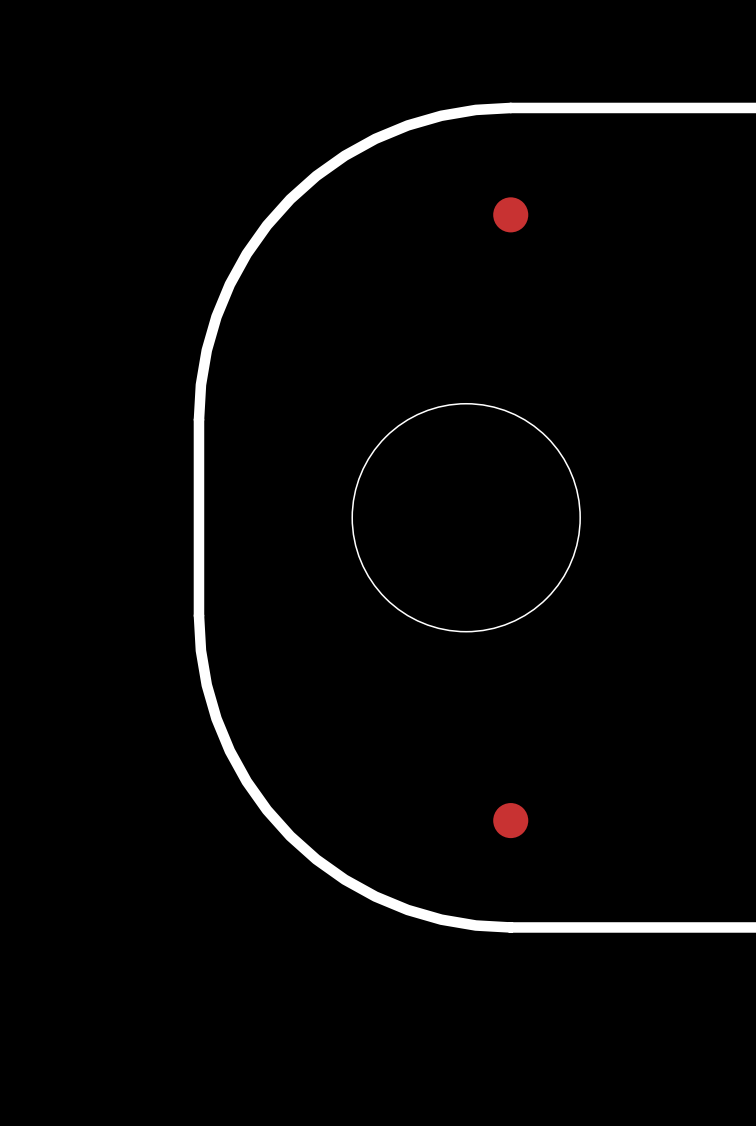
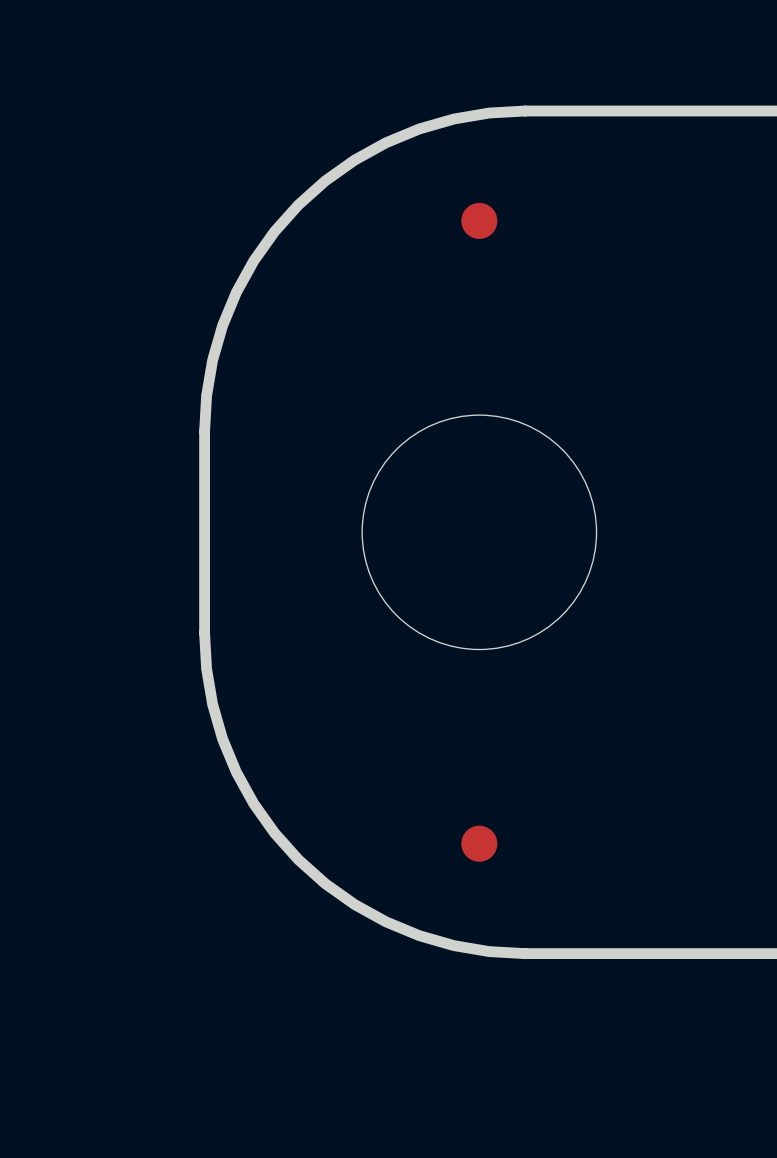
part position: (510, 214) -> (479, 220)
part position: (510, 820) -> (479, 843)

